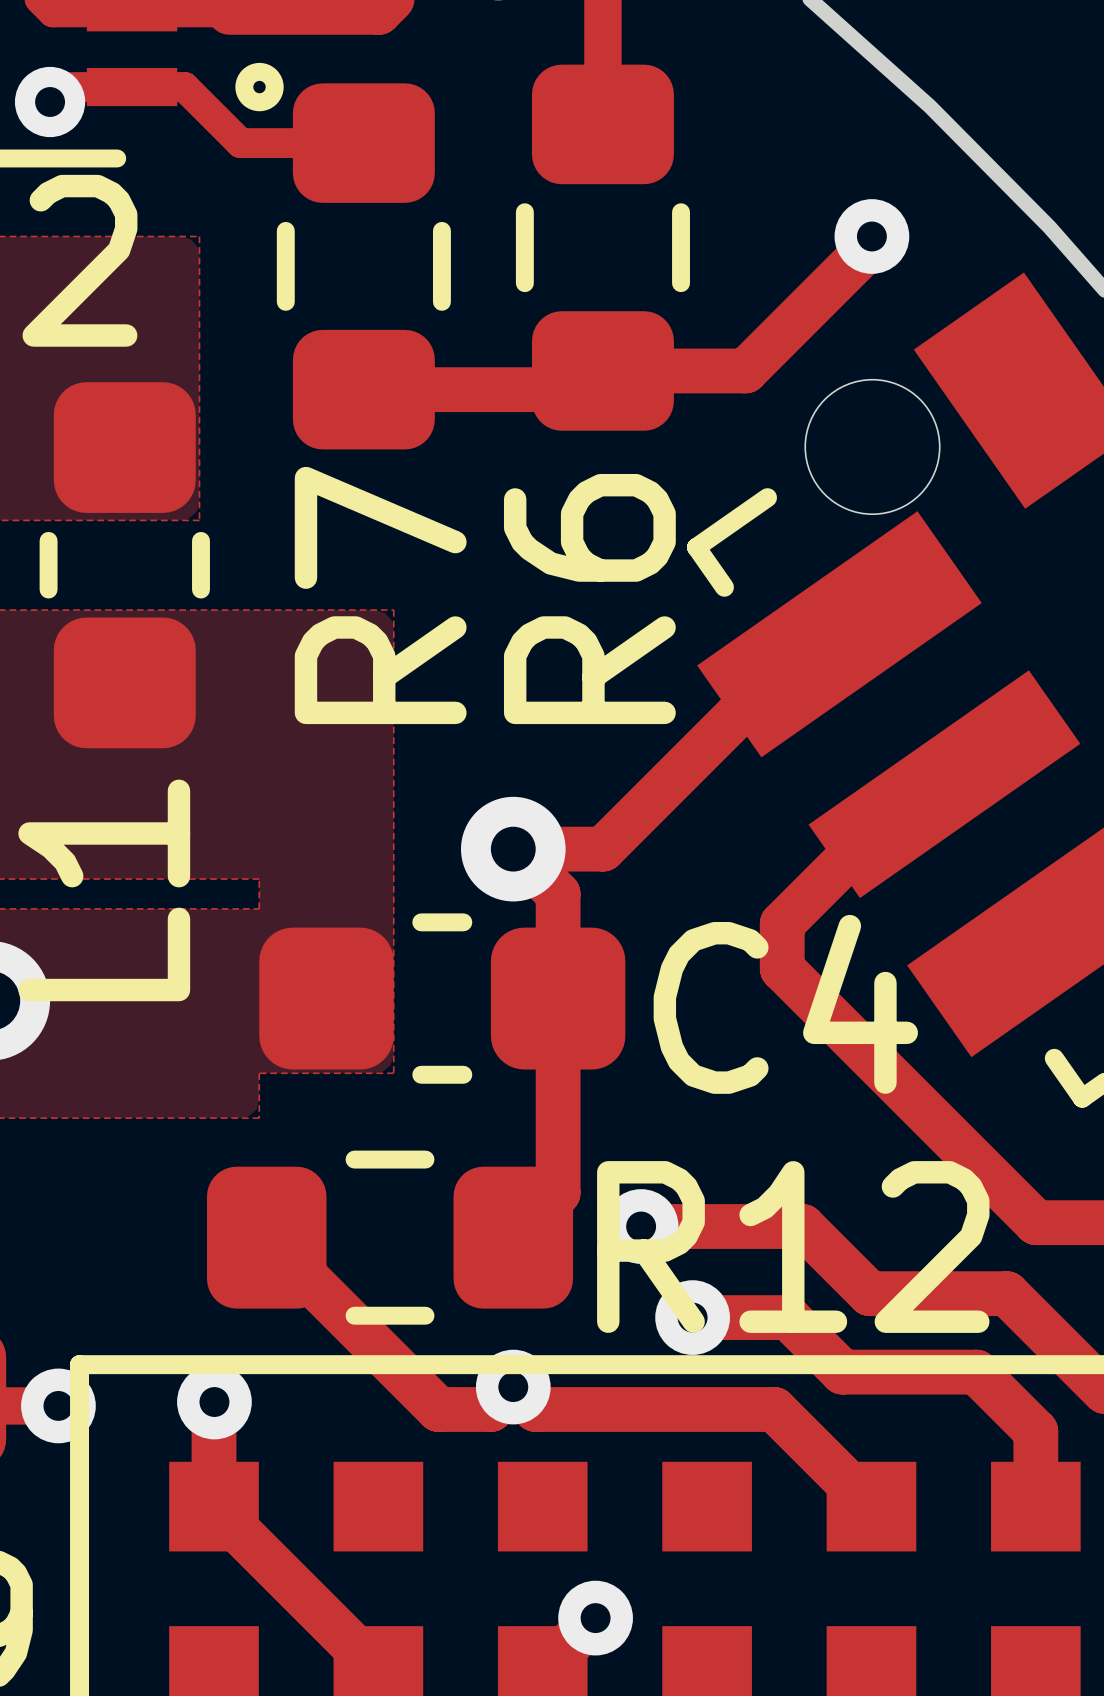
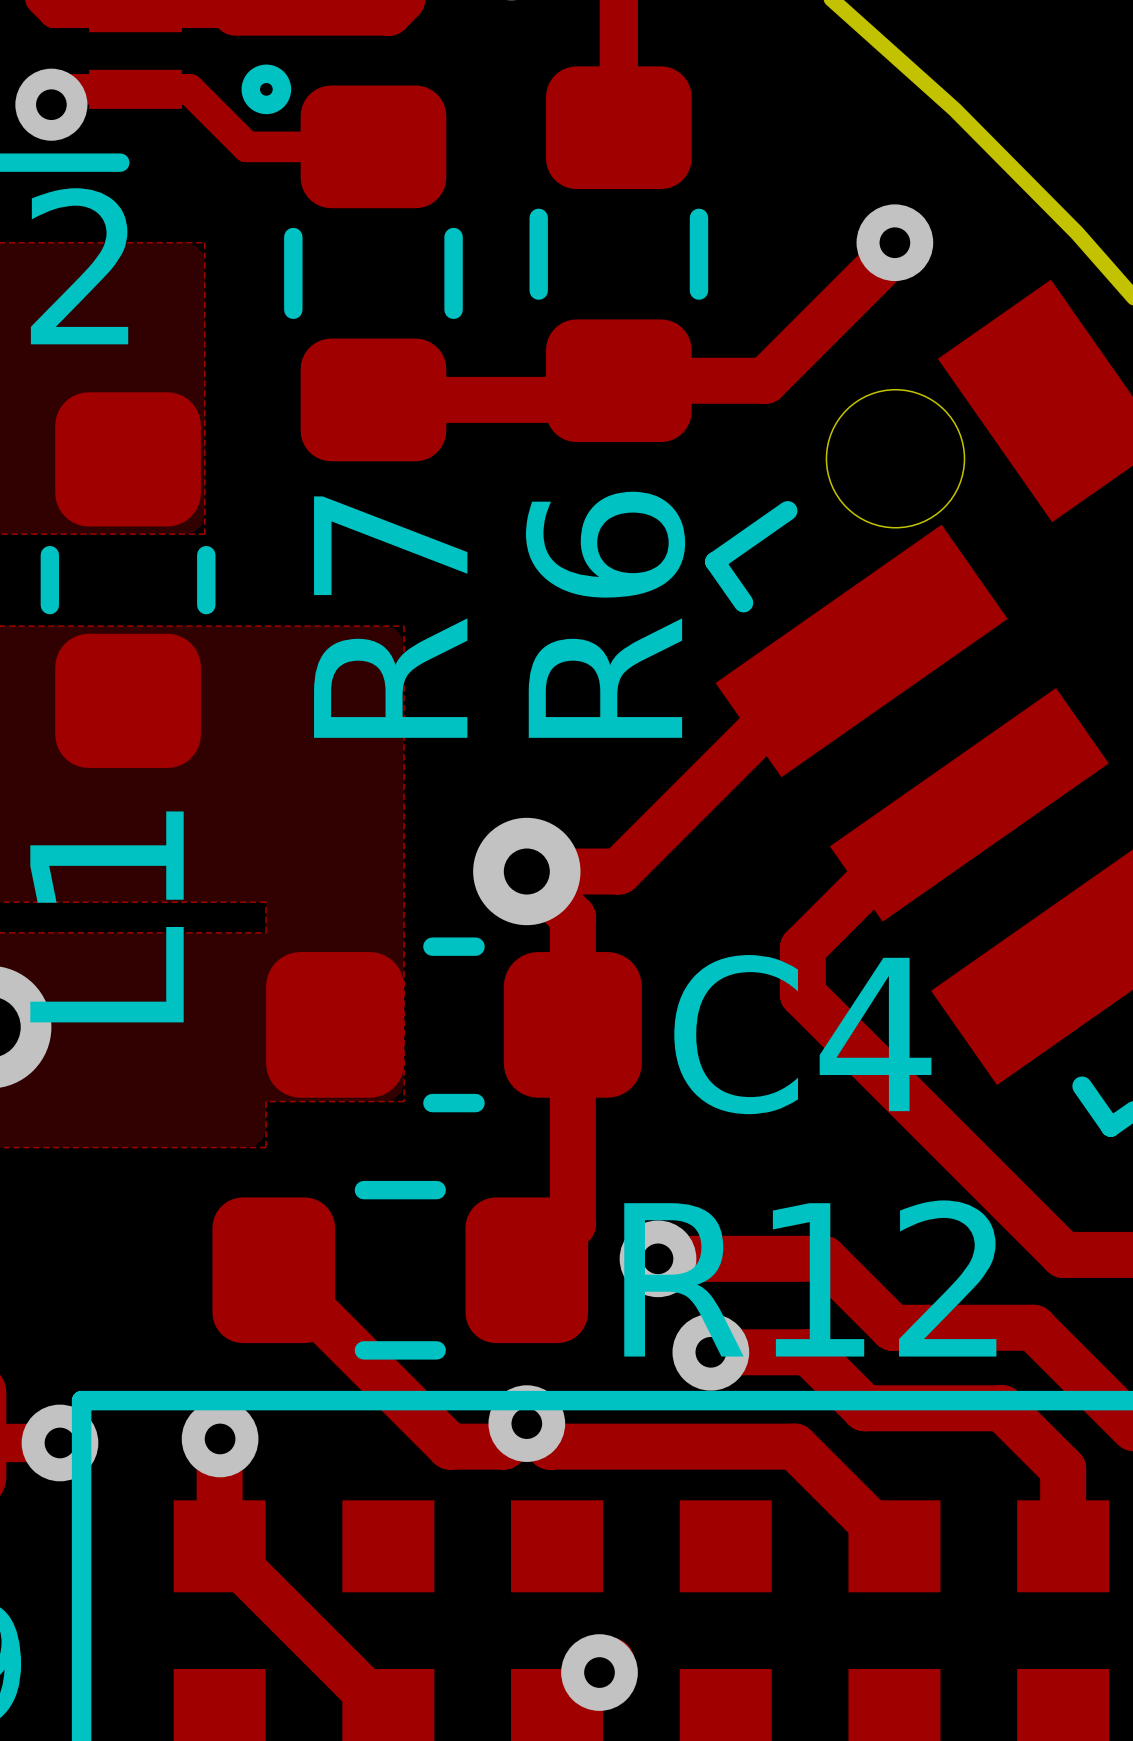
via position: (595, 1618) -> (599, 1672)

